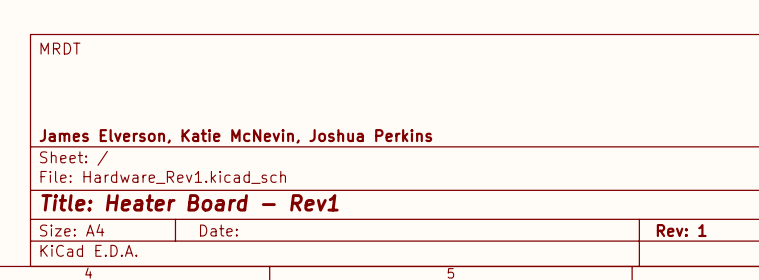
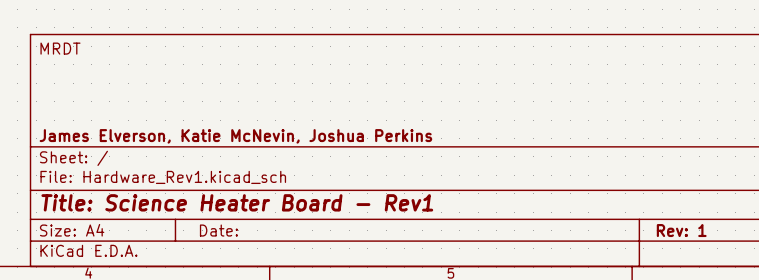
title block: Title: Heater Board - Rev1 (190, 202) -> Title: Science Heater Board - Rev1 (237, 202)

